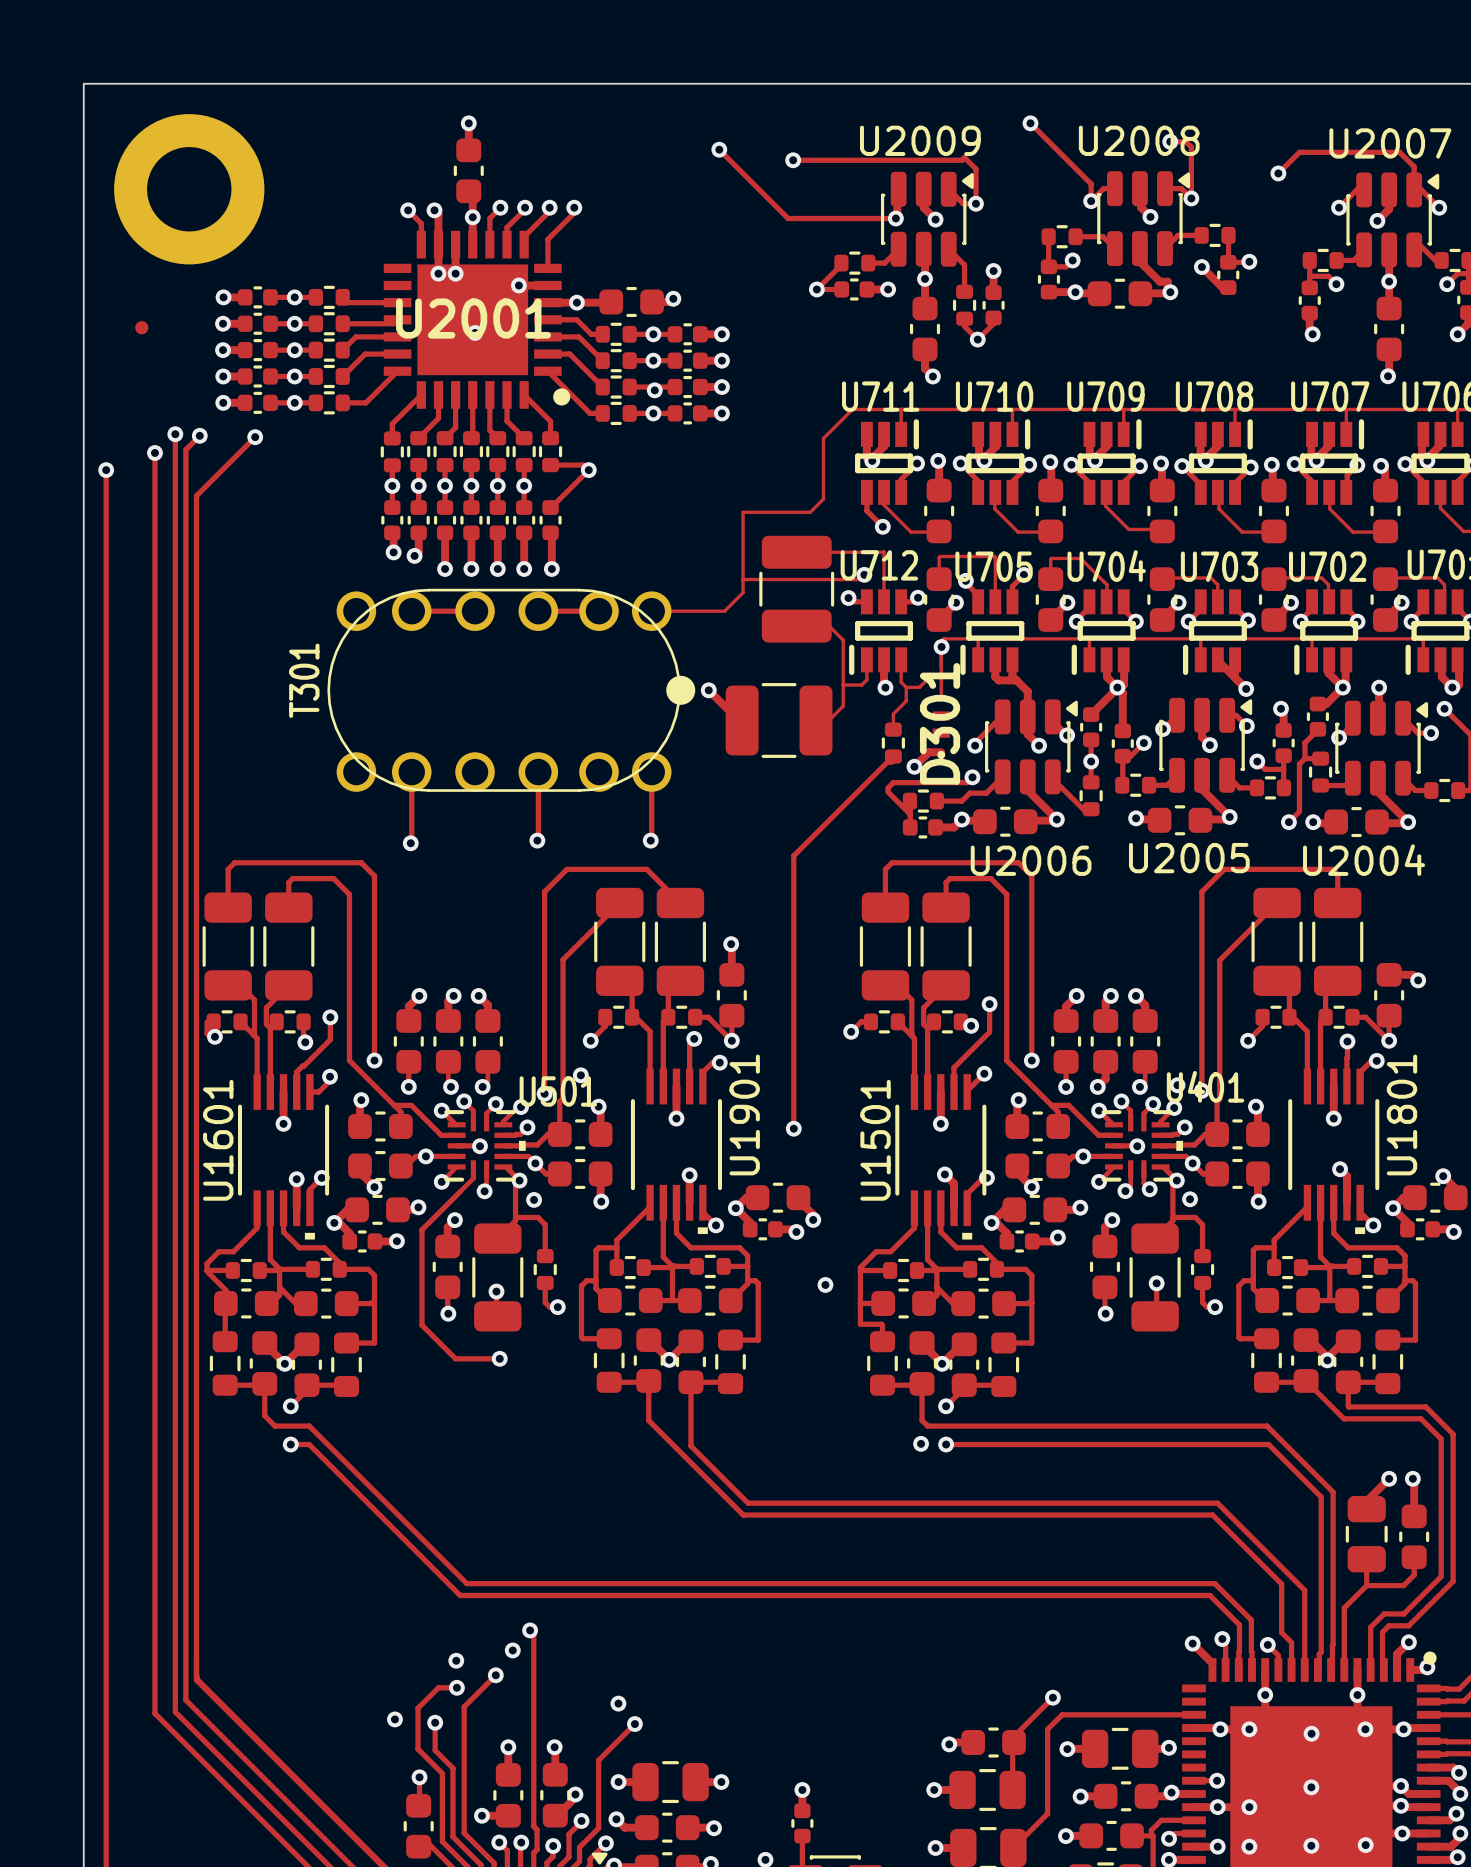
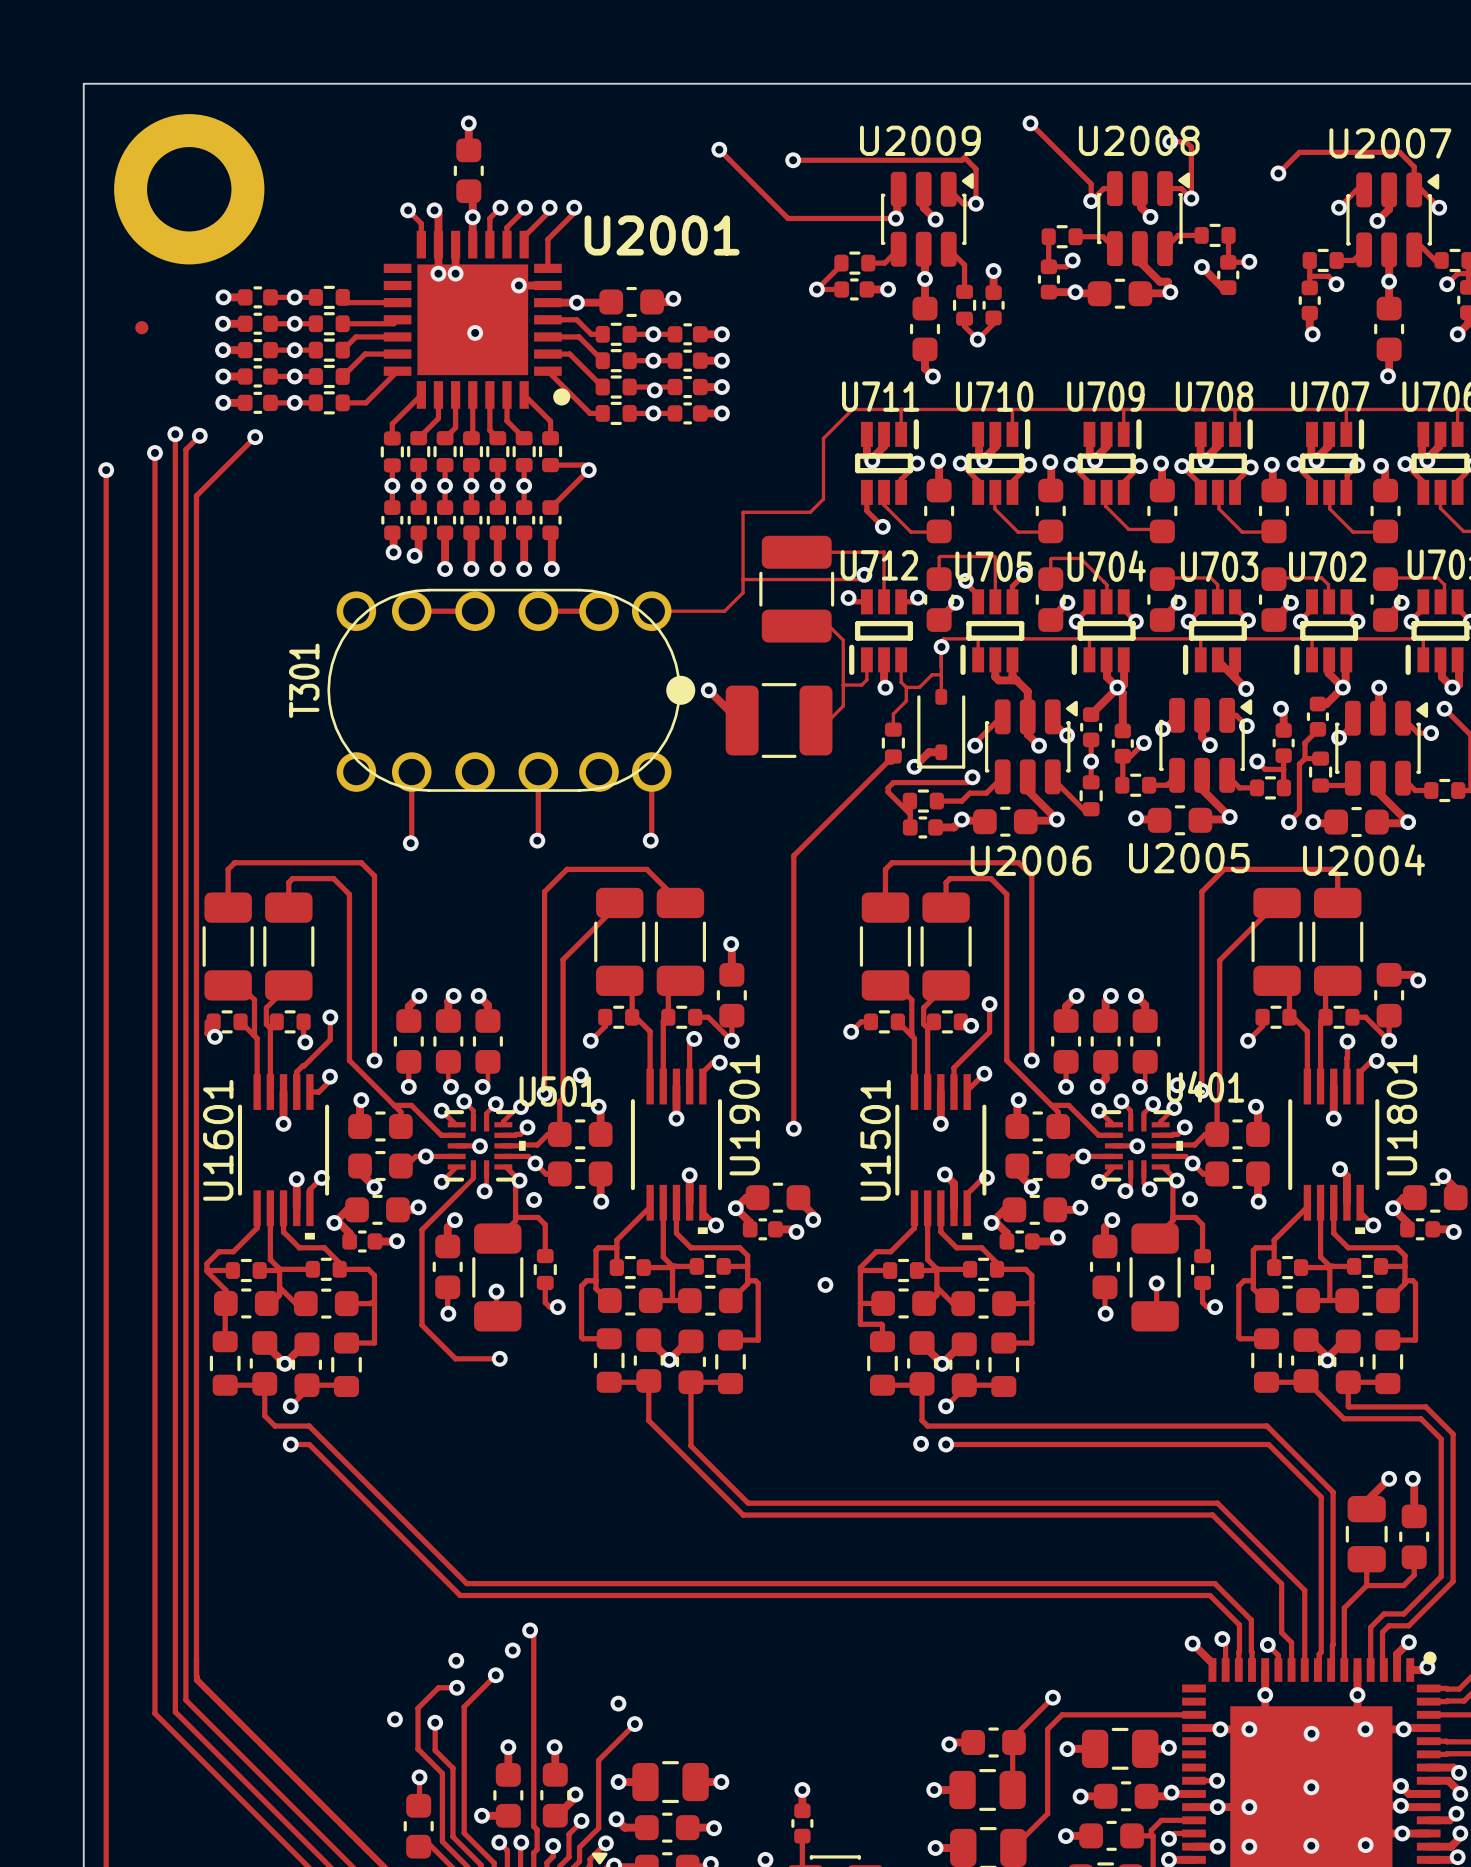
U2001 name position: U2001 (473, 318) -> U2001 (662, 235)
part: none -> (941, 728)
D301: (941, 735) -> none

